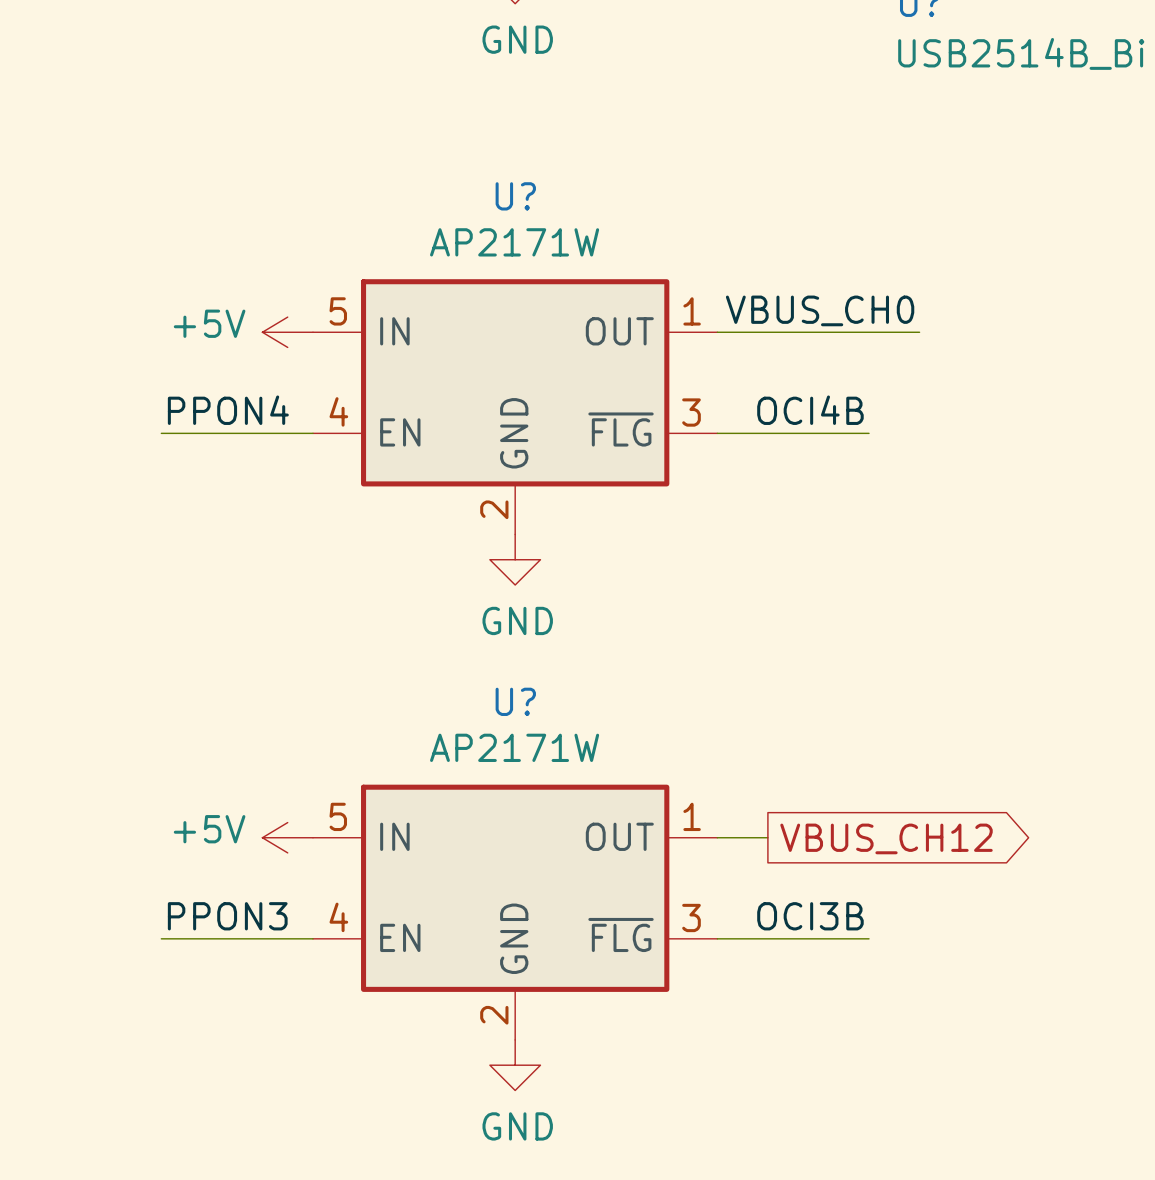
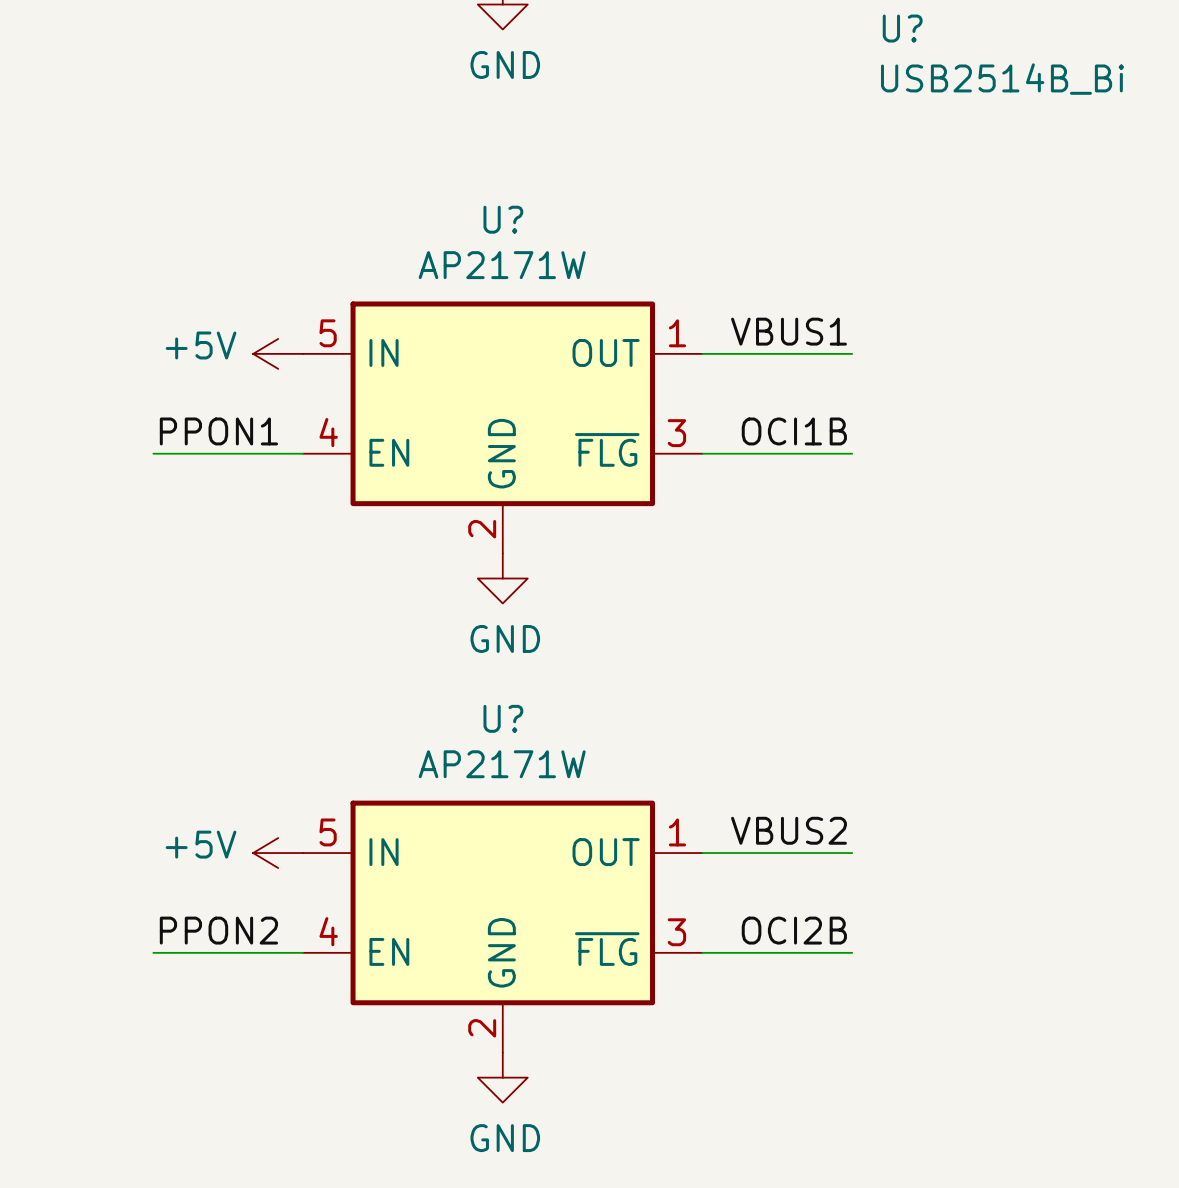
label: VBUS_CH0 (820, 310) -> VBUS1 (789, 331)
wire: (869, 332) (919, 332) -> none
label: PPON4 (228, 410) -> PPON1 (218, 431)
label: OCI4B (810, 410) -> OCI1B (794, 431)
label: none -> VBUS2 (789, 830)
wire: none -> (752, 853) (852, 853)
global label: VBUS_CH12 (886, 838) -> none
label: PPON3 (227, 916) -> PPON2 (218, 930)
label: OCI3B (810, 916) -> OCI2B (794, 930)

